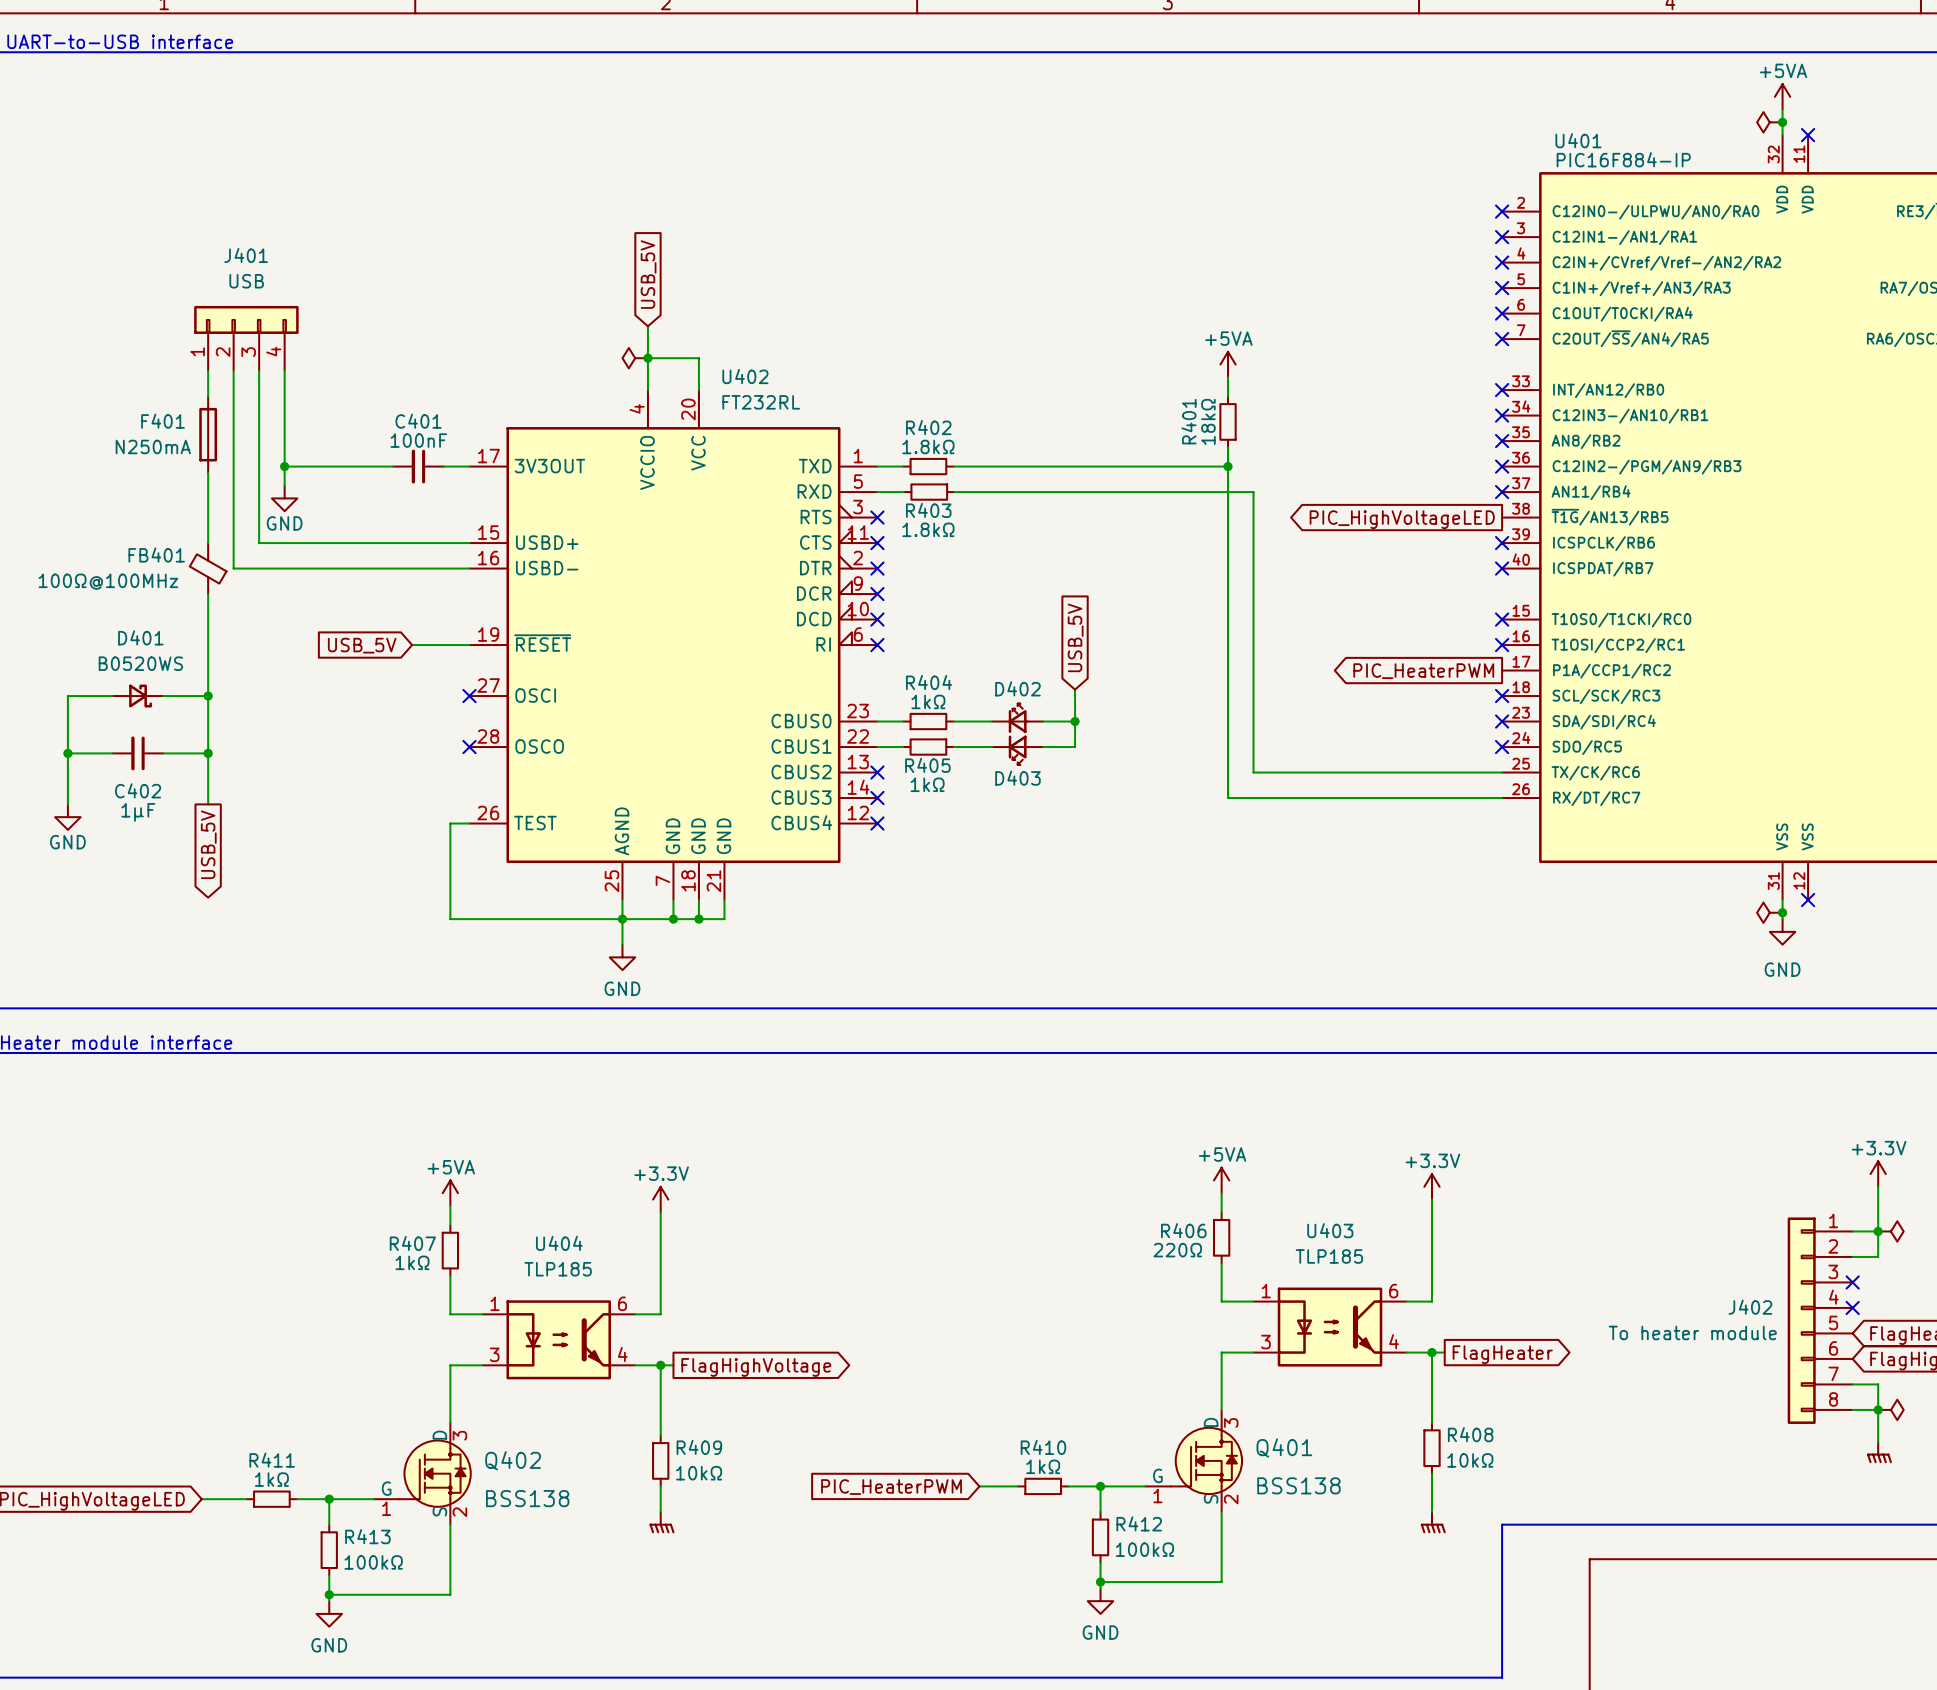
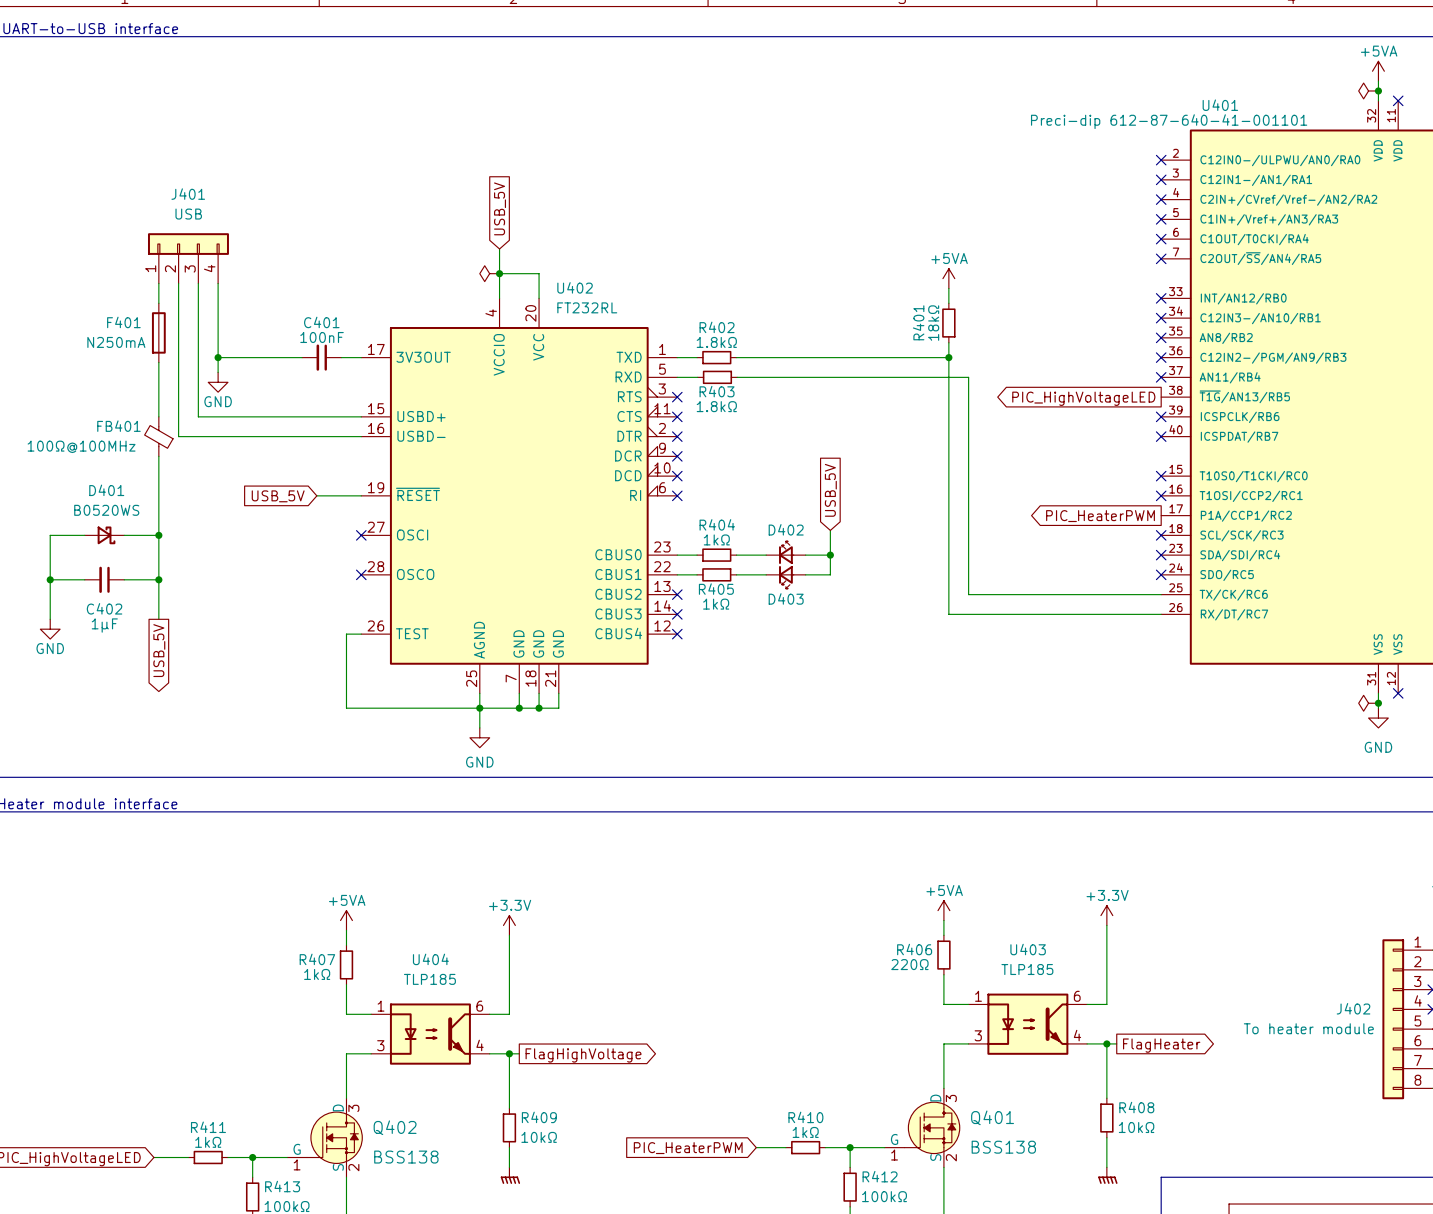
U401 value: PIC16F884-IP (1623, 159) -> Preci-dip 612-87-640-41-001101 (1169, 121)

